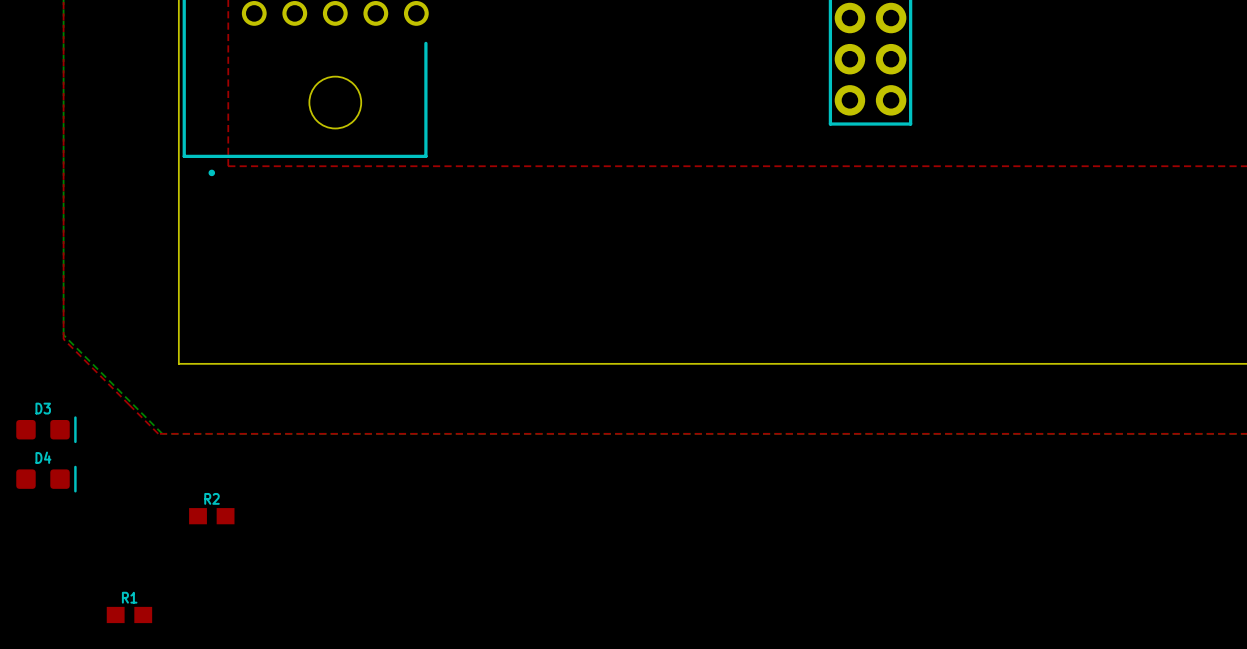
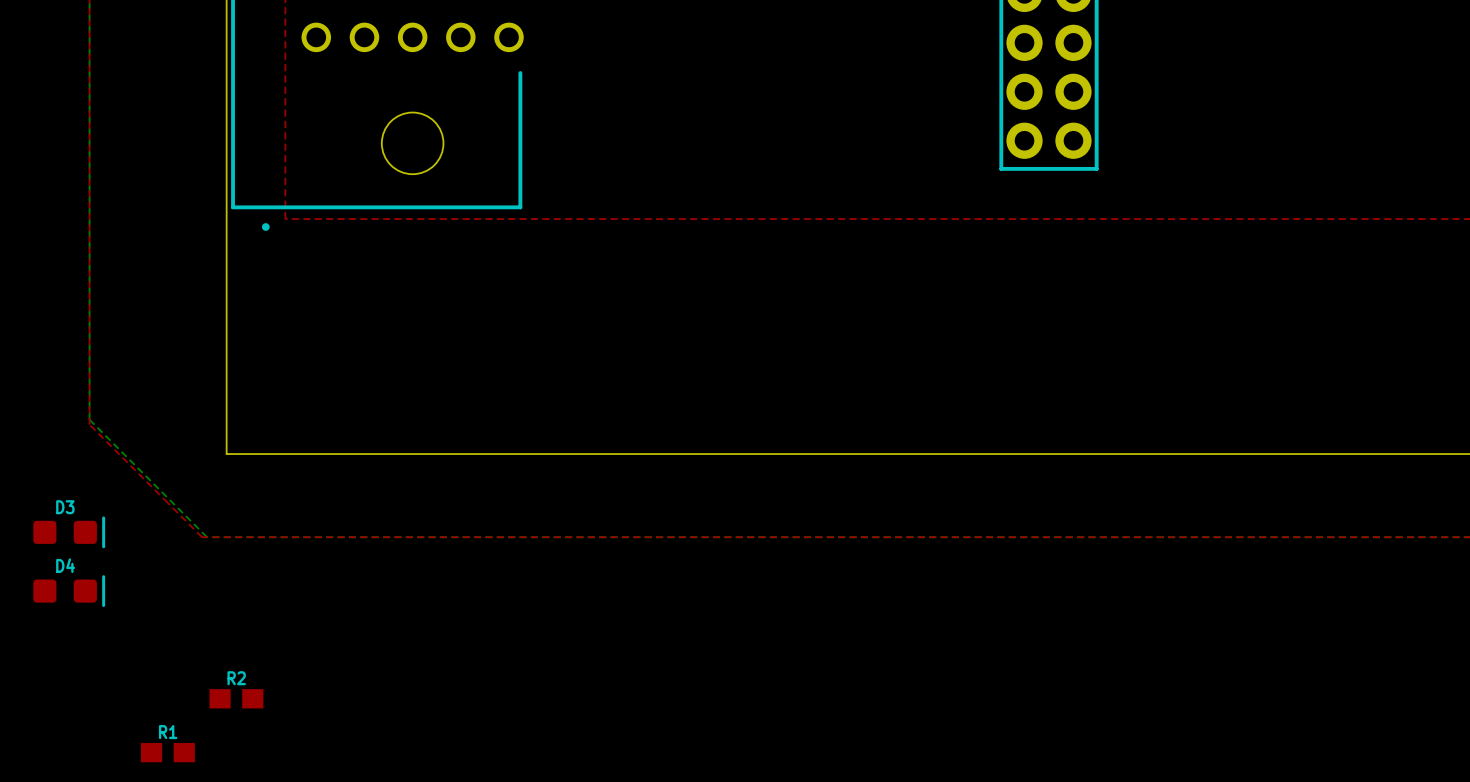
R2 position: (211, 516) -> (236, 698)

